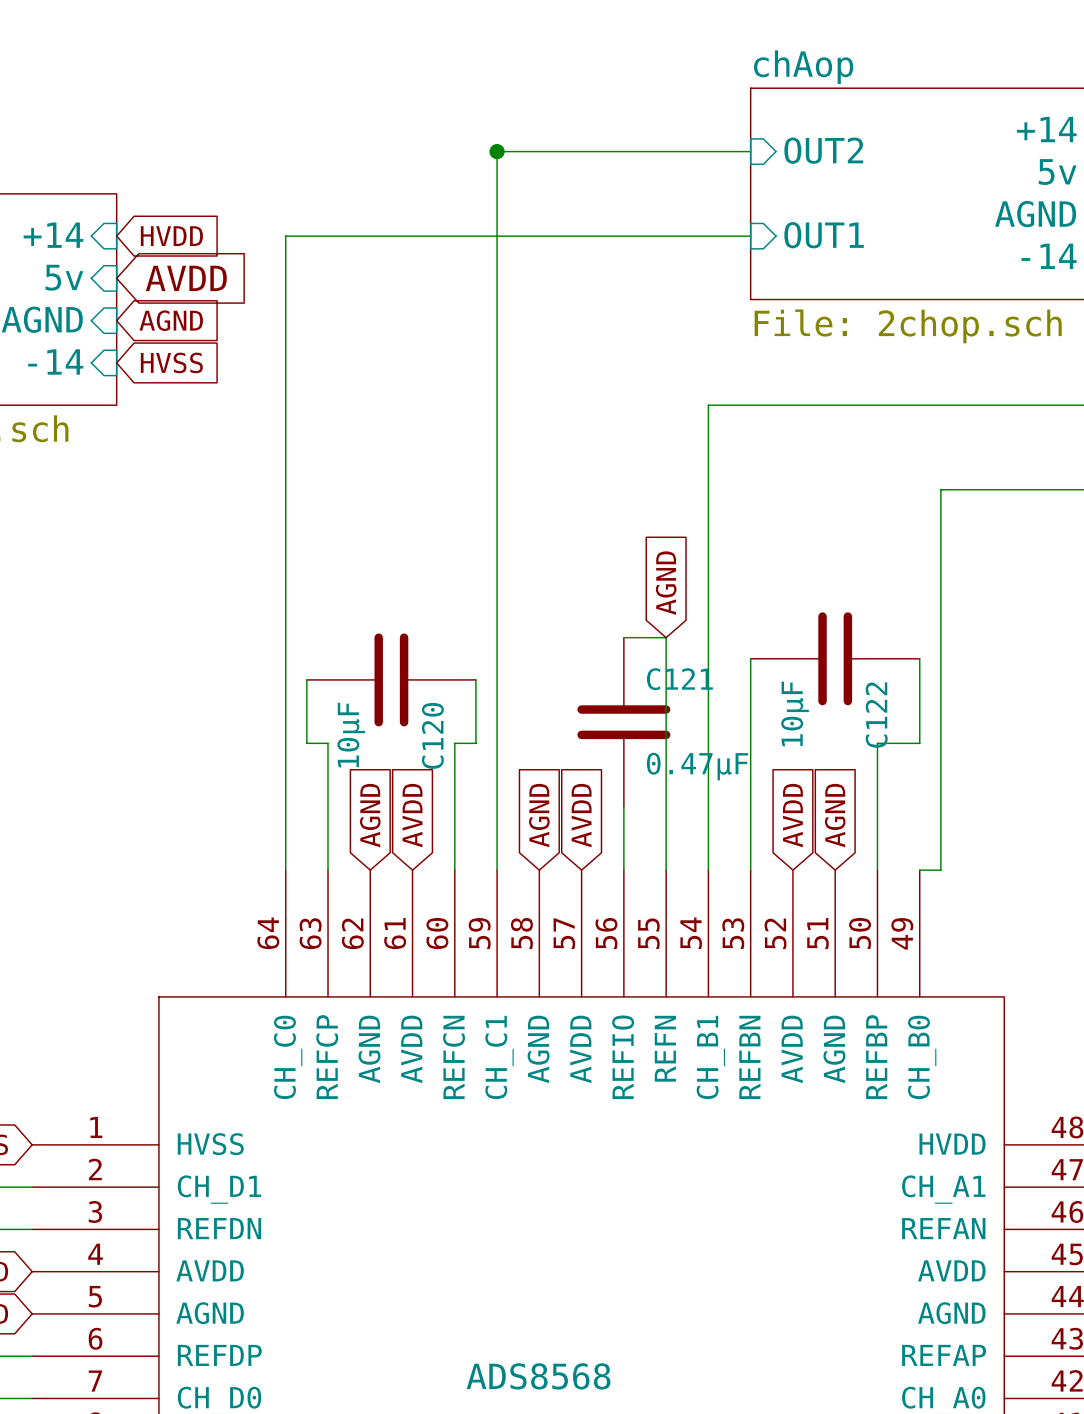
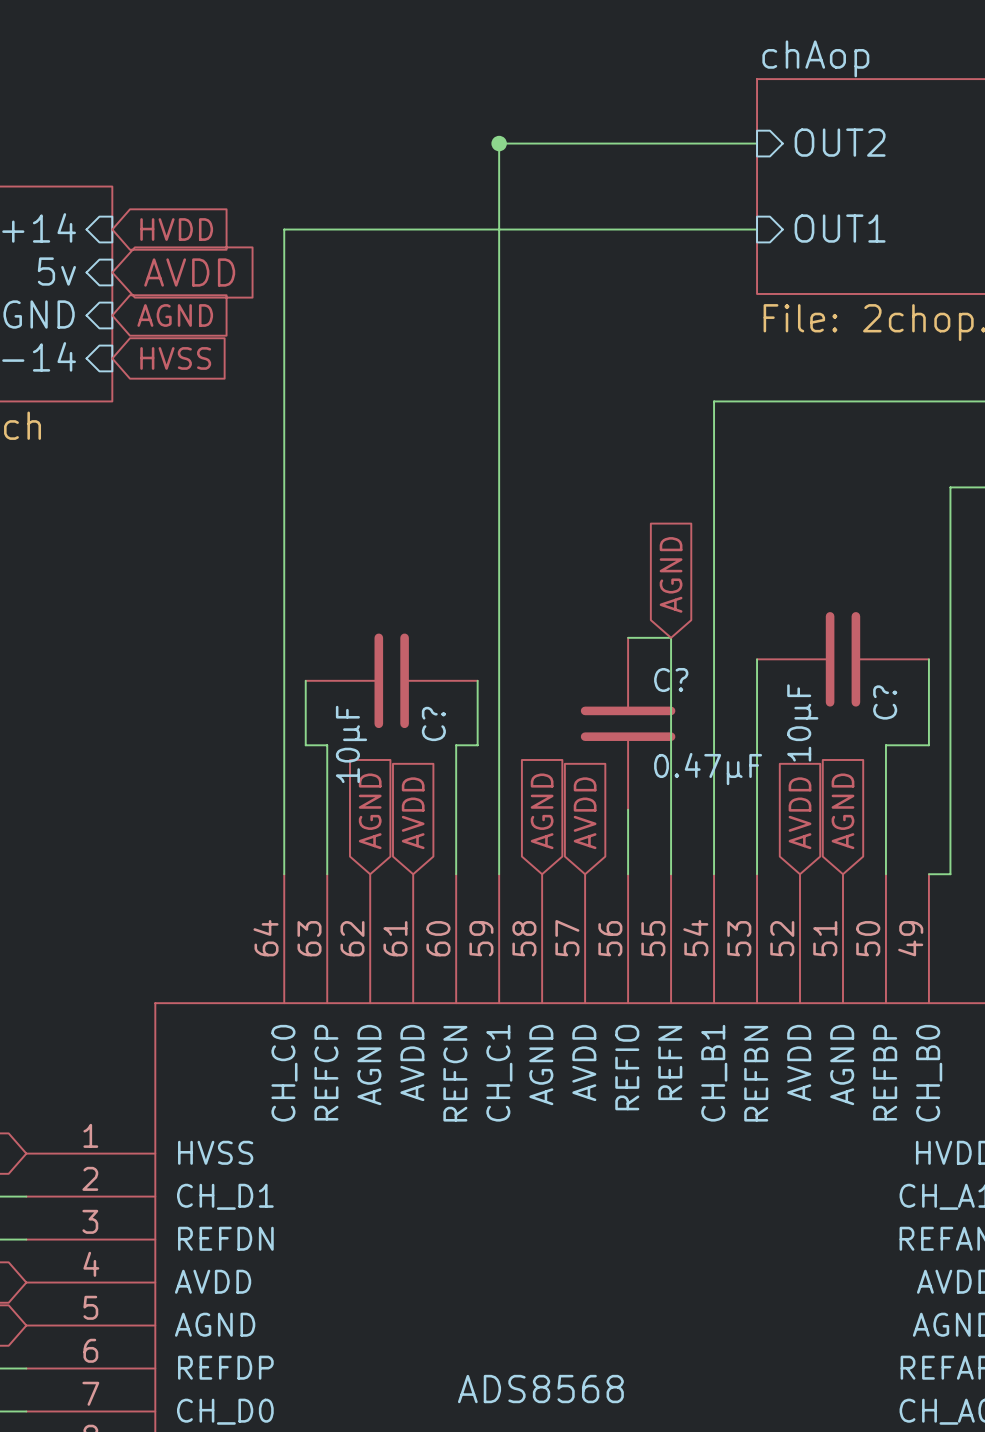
C121 name: C121 (679, 679) -> C? (671, 680)
C122 name: C122 (876, 715) -> C? (885, 702)
C120 name: C120 (432, 735) -> C? (433, 723)

